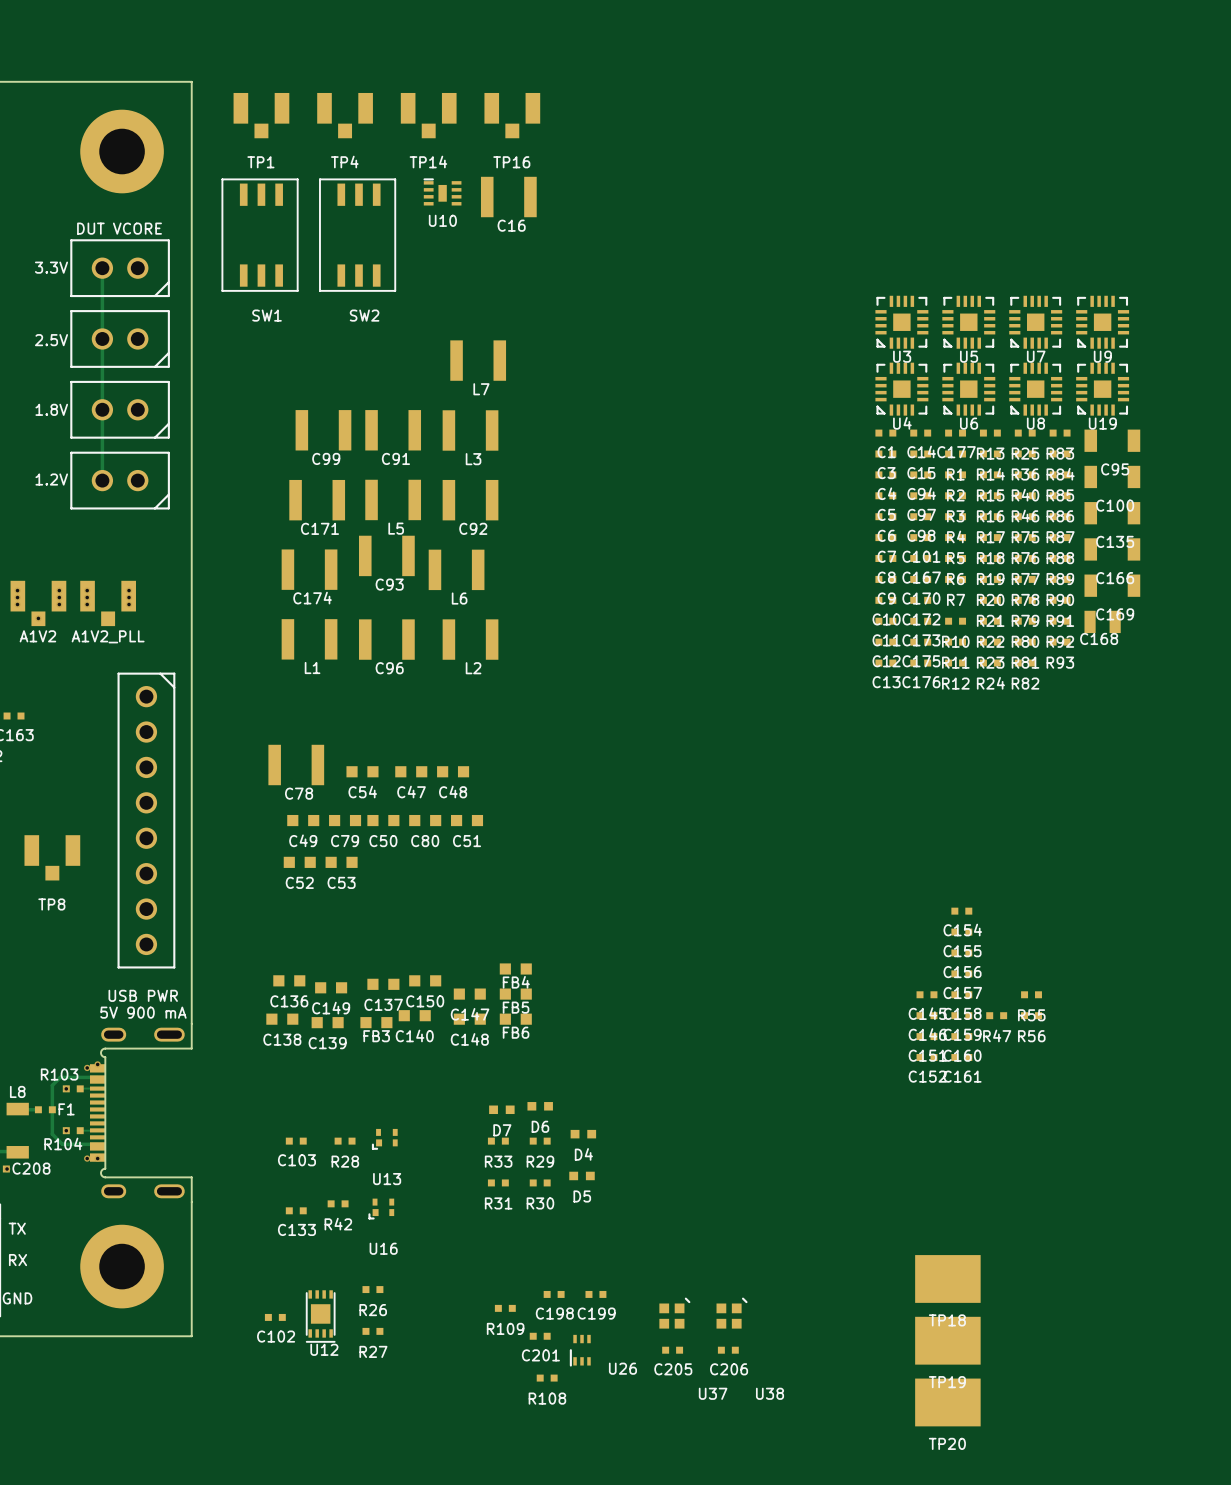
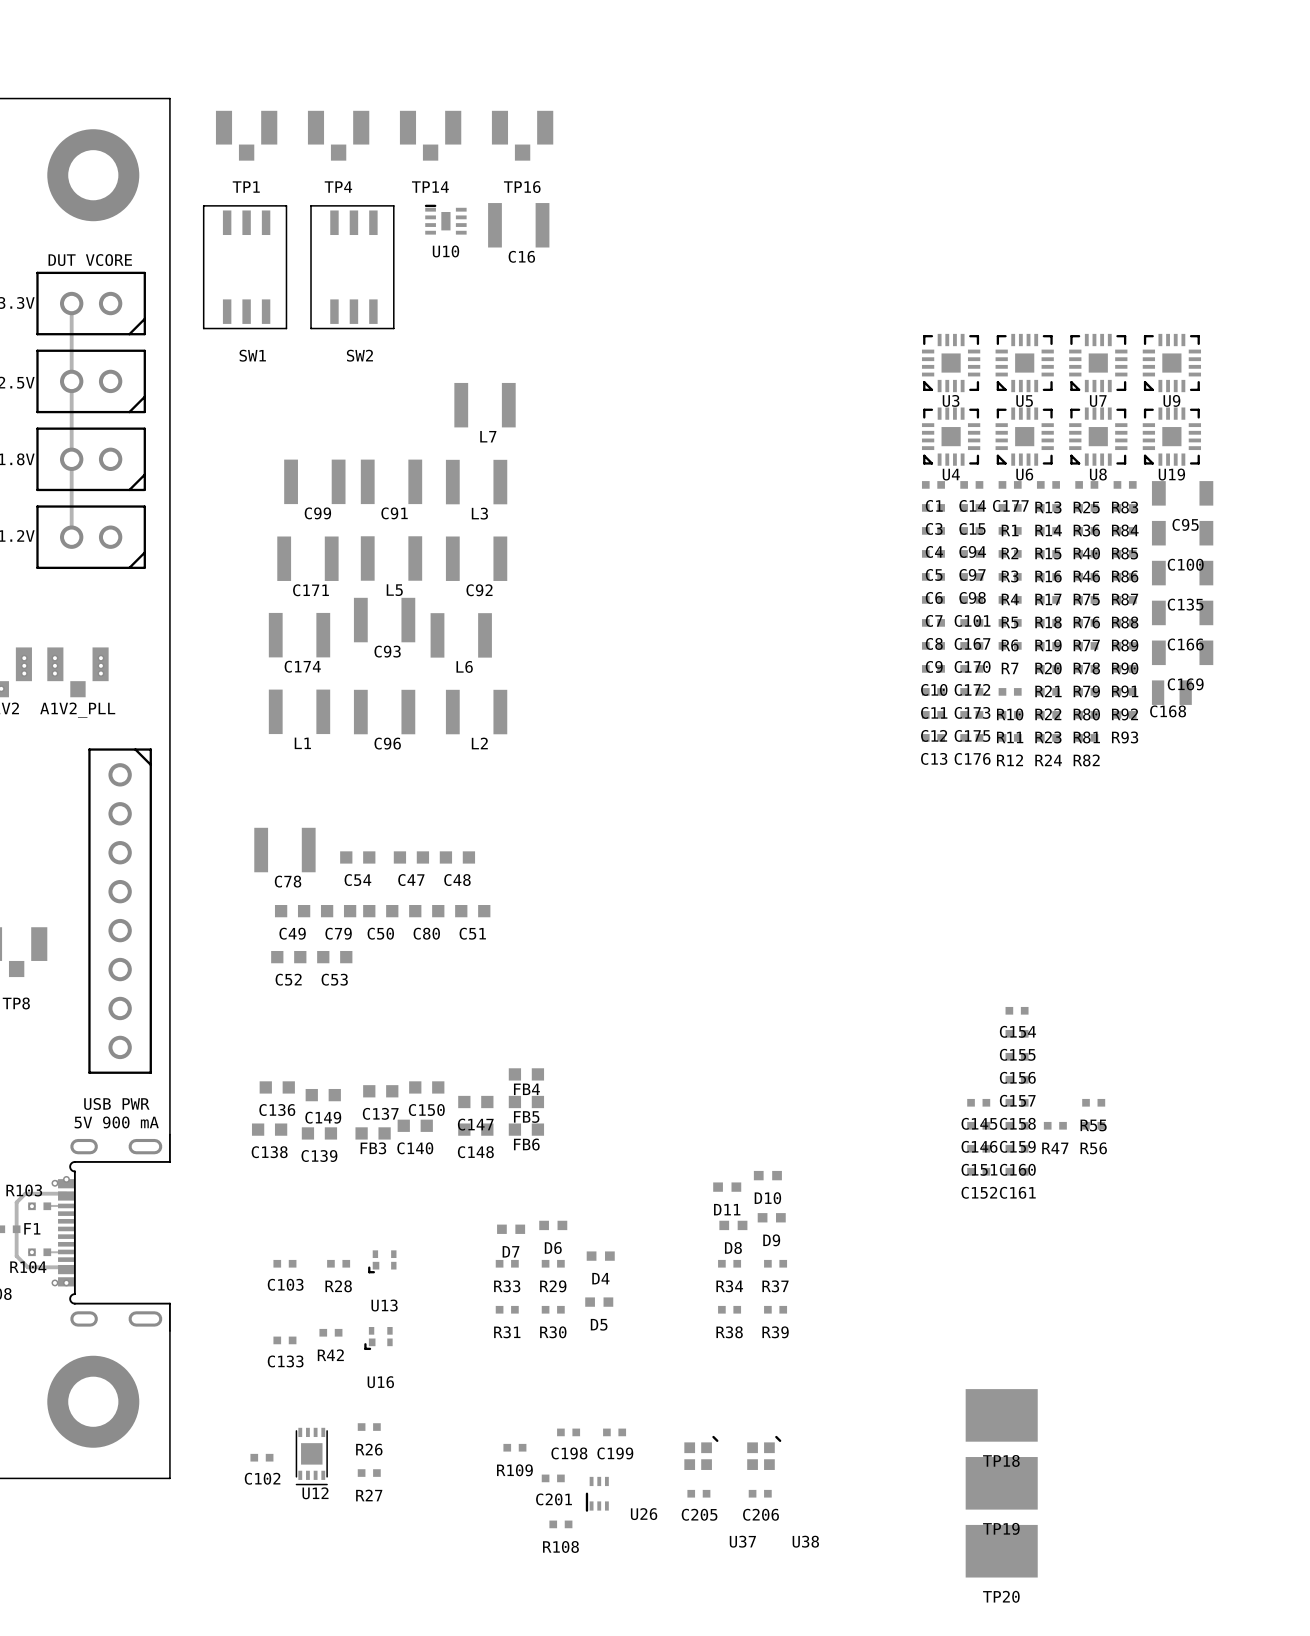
D10: none -> (767, 1175)
D11: none -> (727, 1187)
D9: none -> (771, 1217)
D8: none -> (733, 1225)
R34: none -> (729, 1263)
R37: none -> (775, 1263)
R38: none -> (729, 1309)
R39: none -> (775, 1309)

